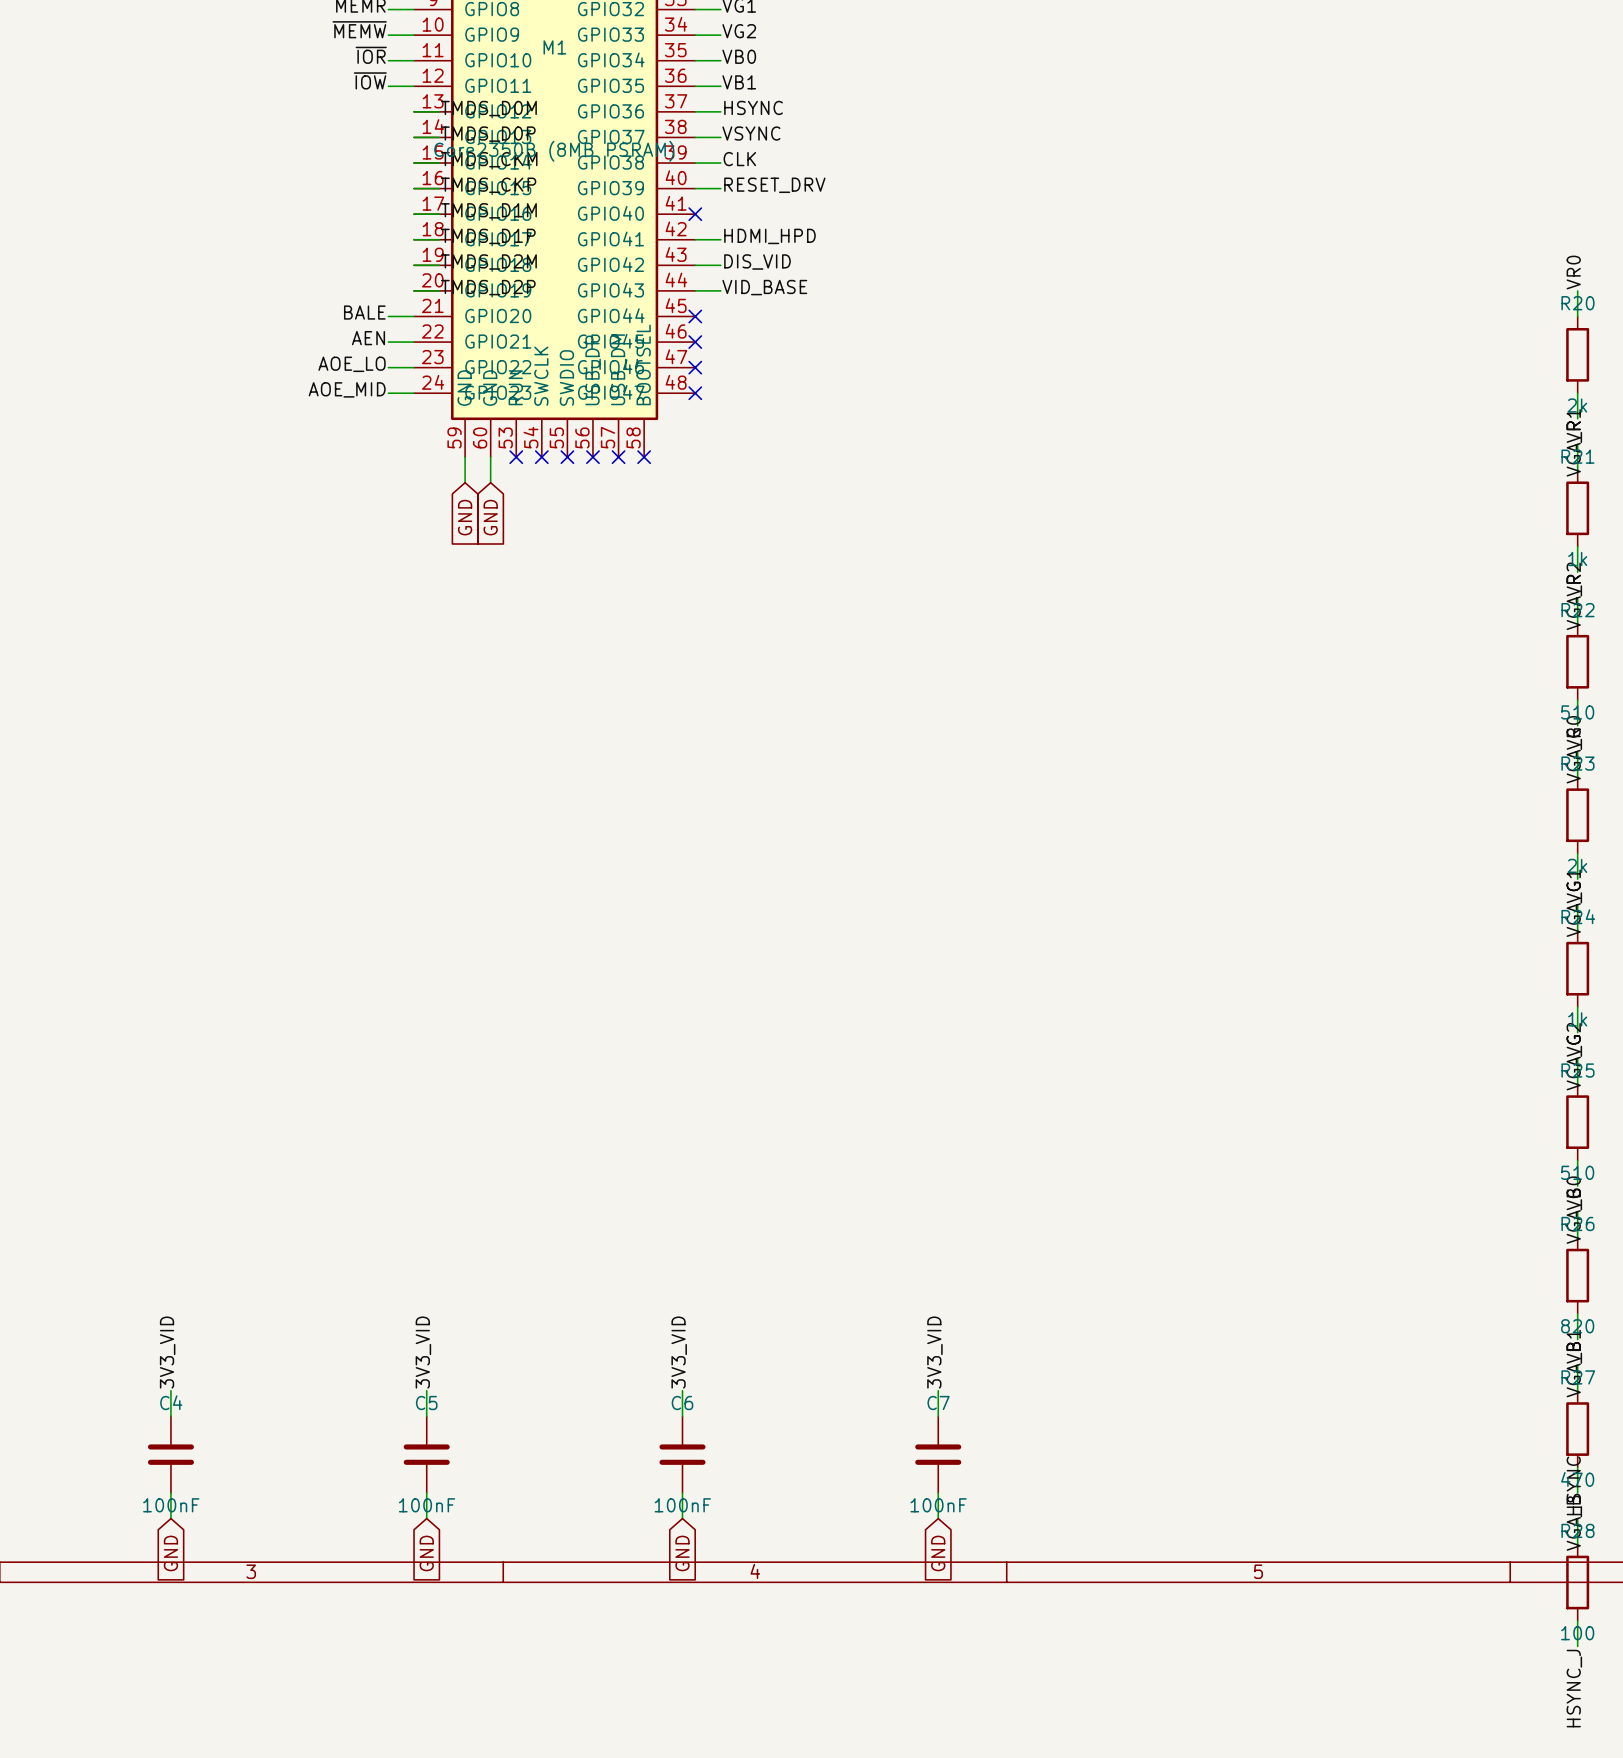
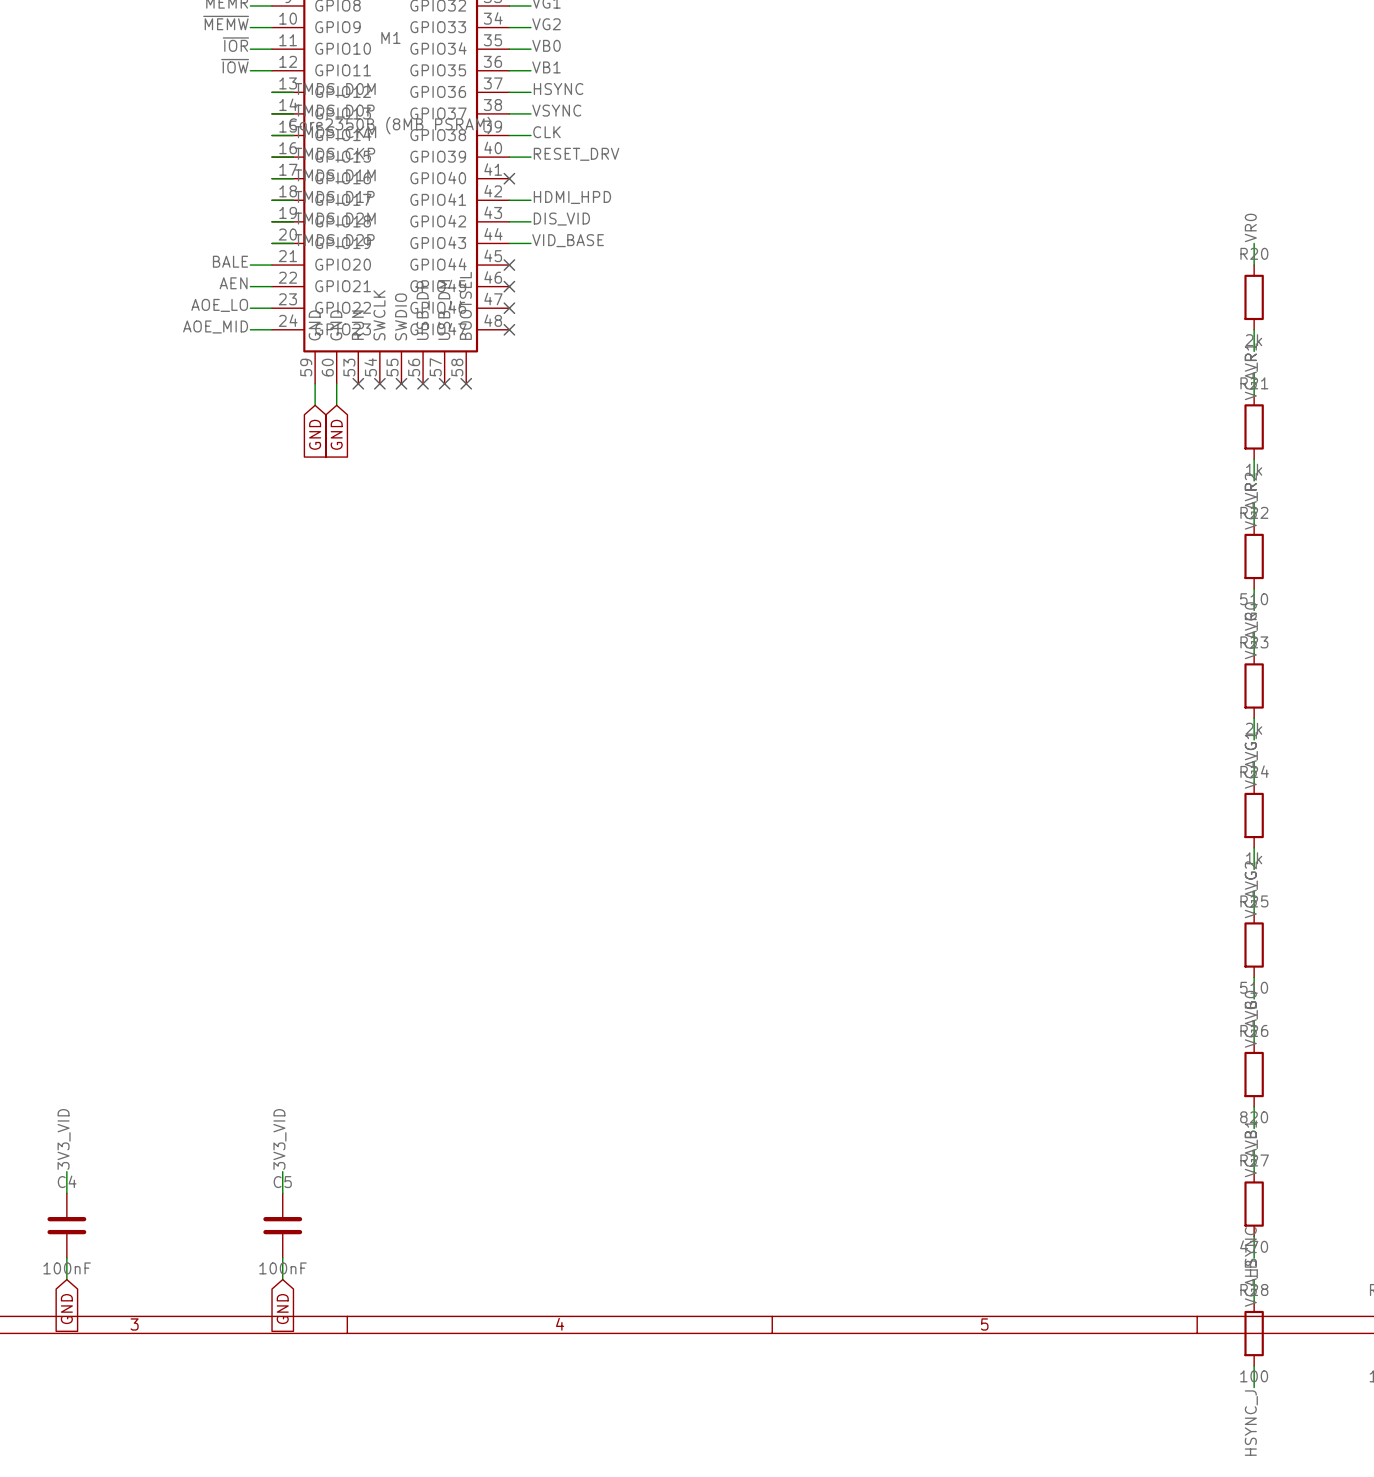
label: 3V3_VID (679, 1352) -> none
label: 3V3_VID (934, 1352) -> none
wire: (682, 1390) (682, 1416) -> none
wire: (938, 1390) (938, 1416) -> none
C6: 100nF (682, 1454) -> none
C7: 100nF (938, 1454) -> none
wire: (682, 1493) (682, 1518) -> none
wire: (938, 1493) (938, 1518) -> none
global label: GND (682, 1553) -> none
global label: GND (938, 1553) -> none

